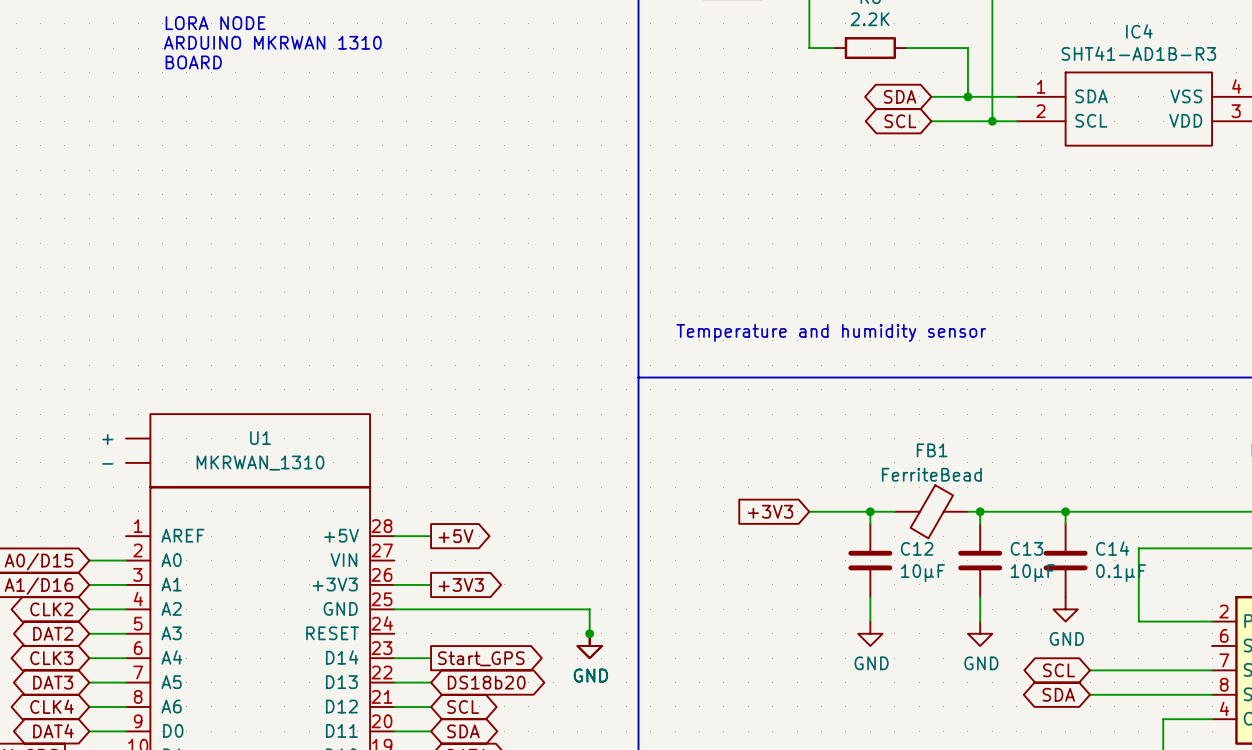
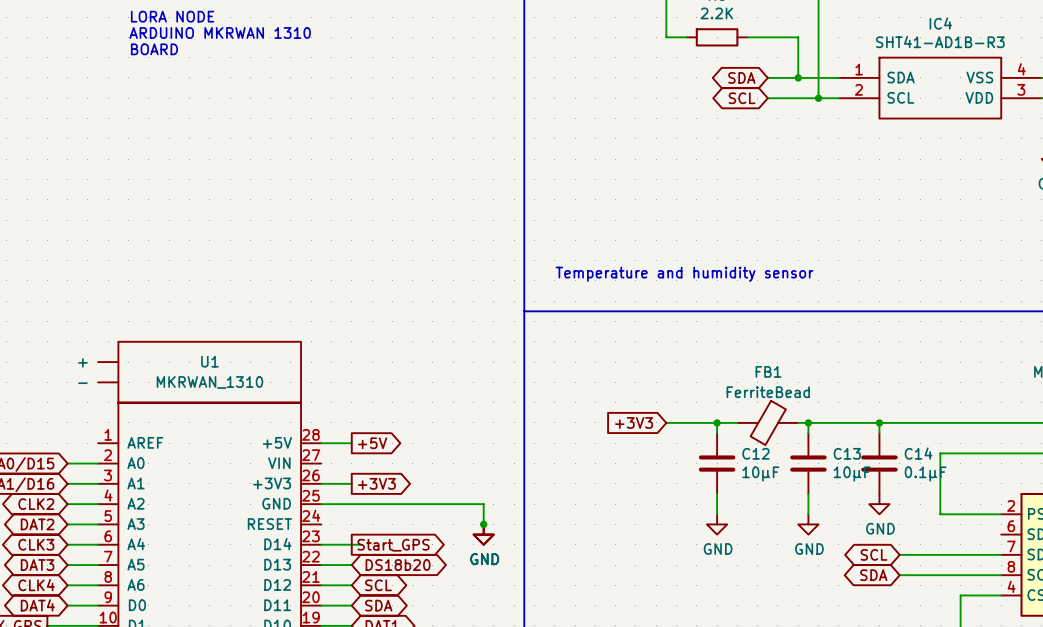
wire: none -> (351, 544) (361, 544)

